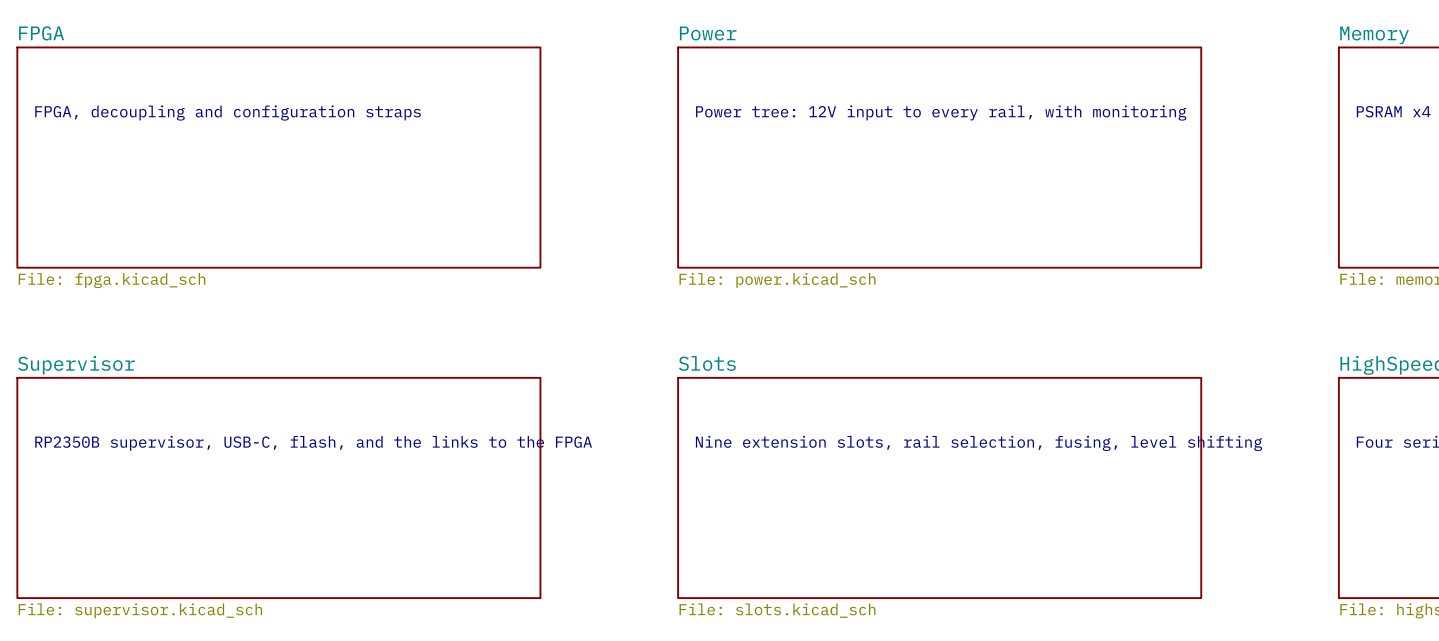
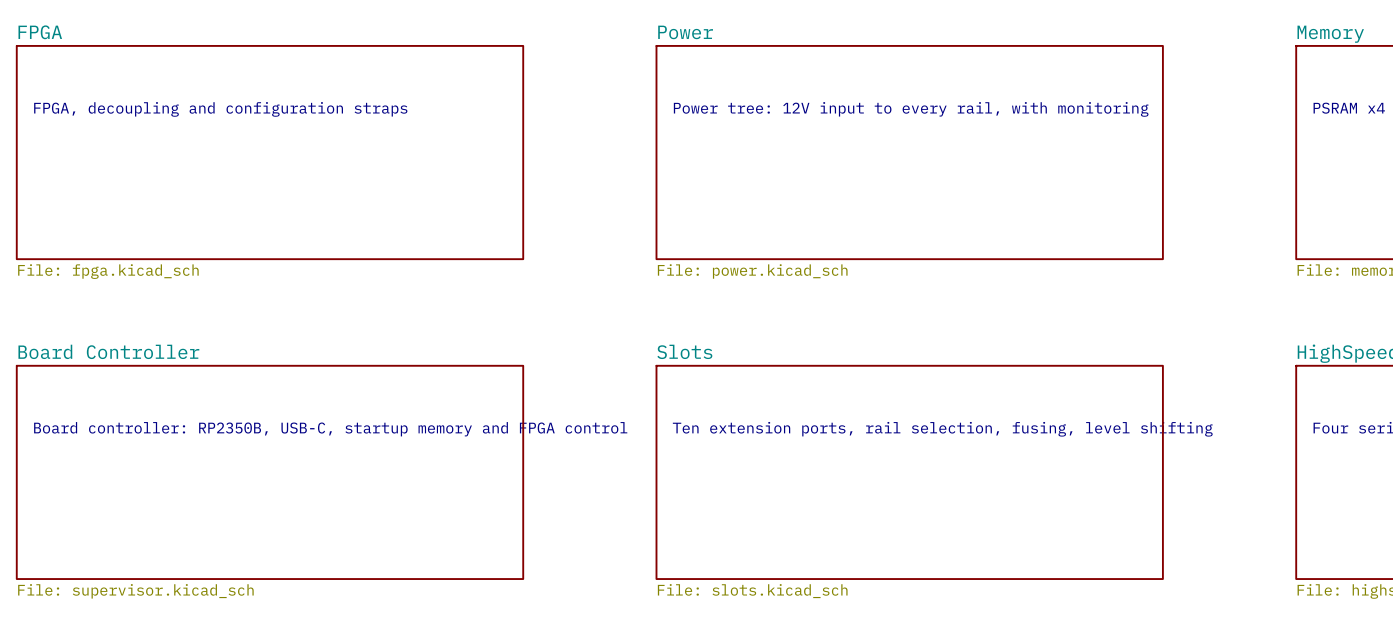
sheet Supervisor name: Supervisor (76, 365) -> Board Controller (108, 351)
text: RP2350B supervisor, USB-C, flash, and the links to the FPGA (313, 443) -> Board controller: RP2350B, USB-C, startup memory and FPGA control (330, 429)
text: Nine extension slots, rail selection, fusing, level shifting (978, 443) -> Ten extension ports, rail selection, fusing, level shifting (942, 429)

